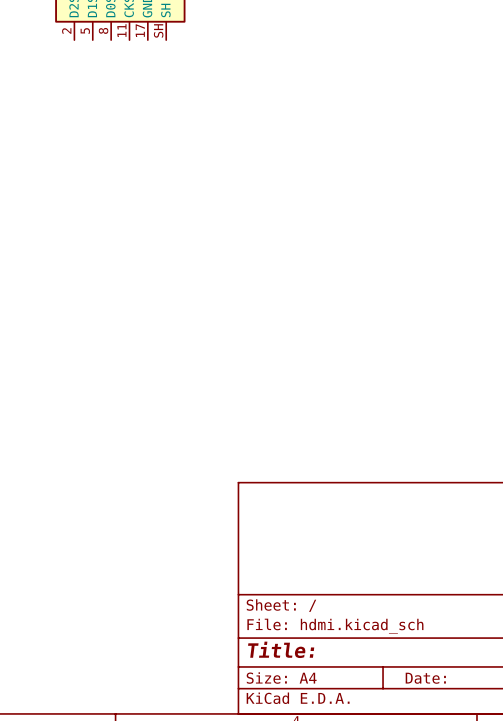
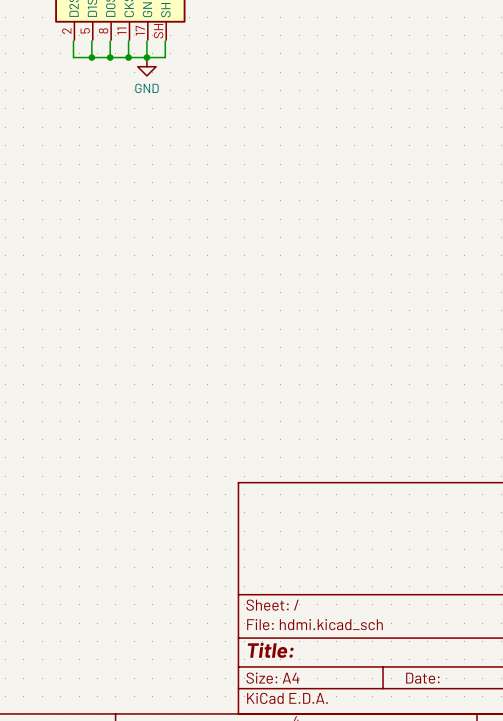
wire: none -> (73, 41) (73, 57) (165, 57) (165, 41)
wire: none -> (91, 41) (91, 57)
wire: none -> (110, 41) (110, 57)
wire: none -> (128, 41) (128, 57)
wire: none -> (146, 41) (146, 57)
junction: none -> (91, 57)
junction: none -> (110, 57)
junction: none -> (128, 57)
junction: none -> (146, 57)
power symbol: none -> GND (146, 66)

